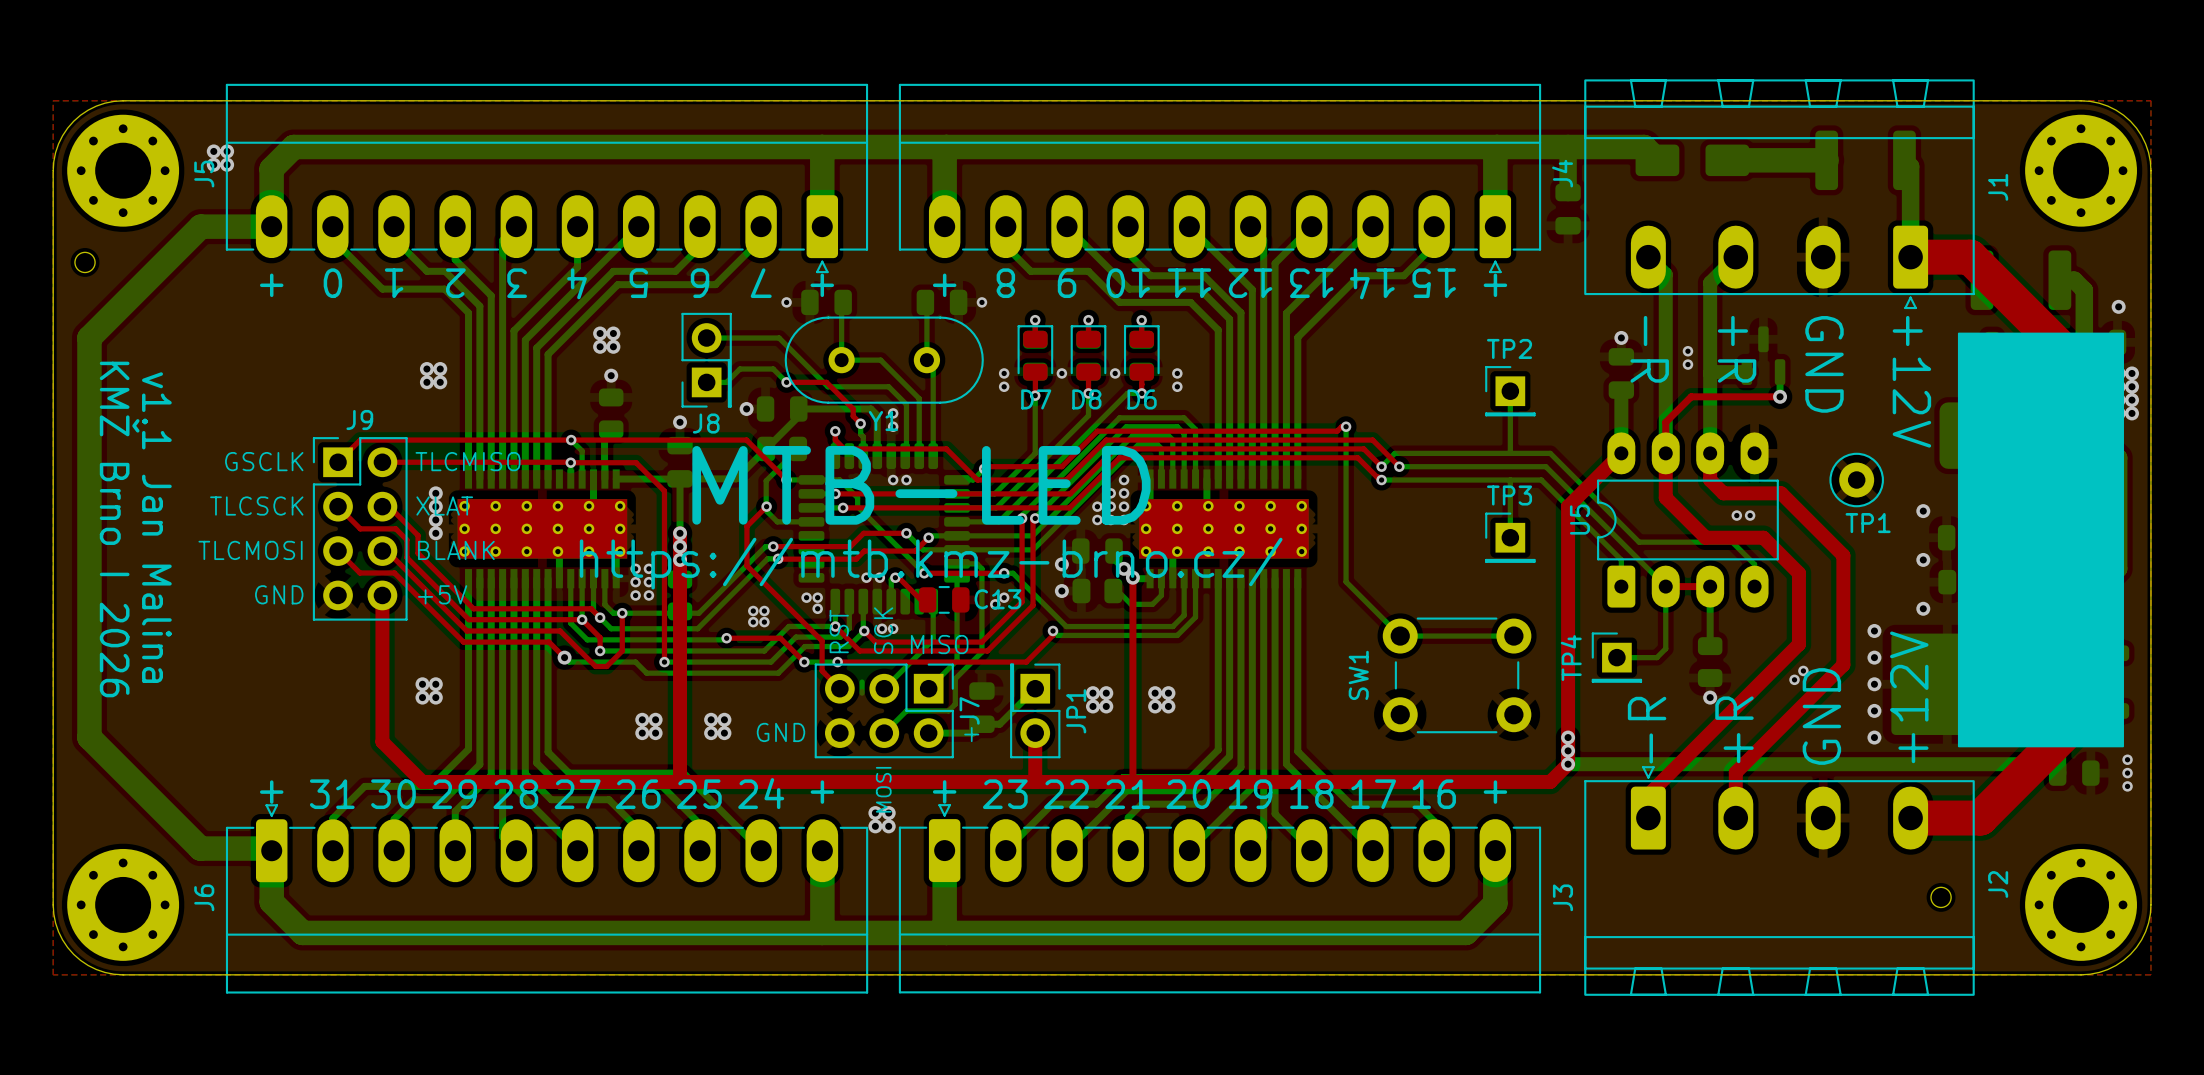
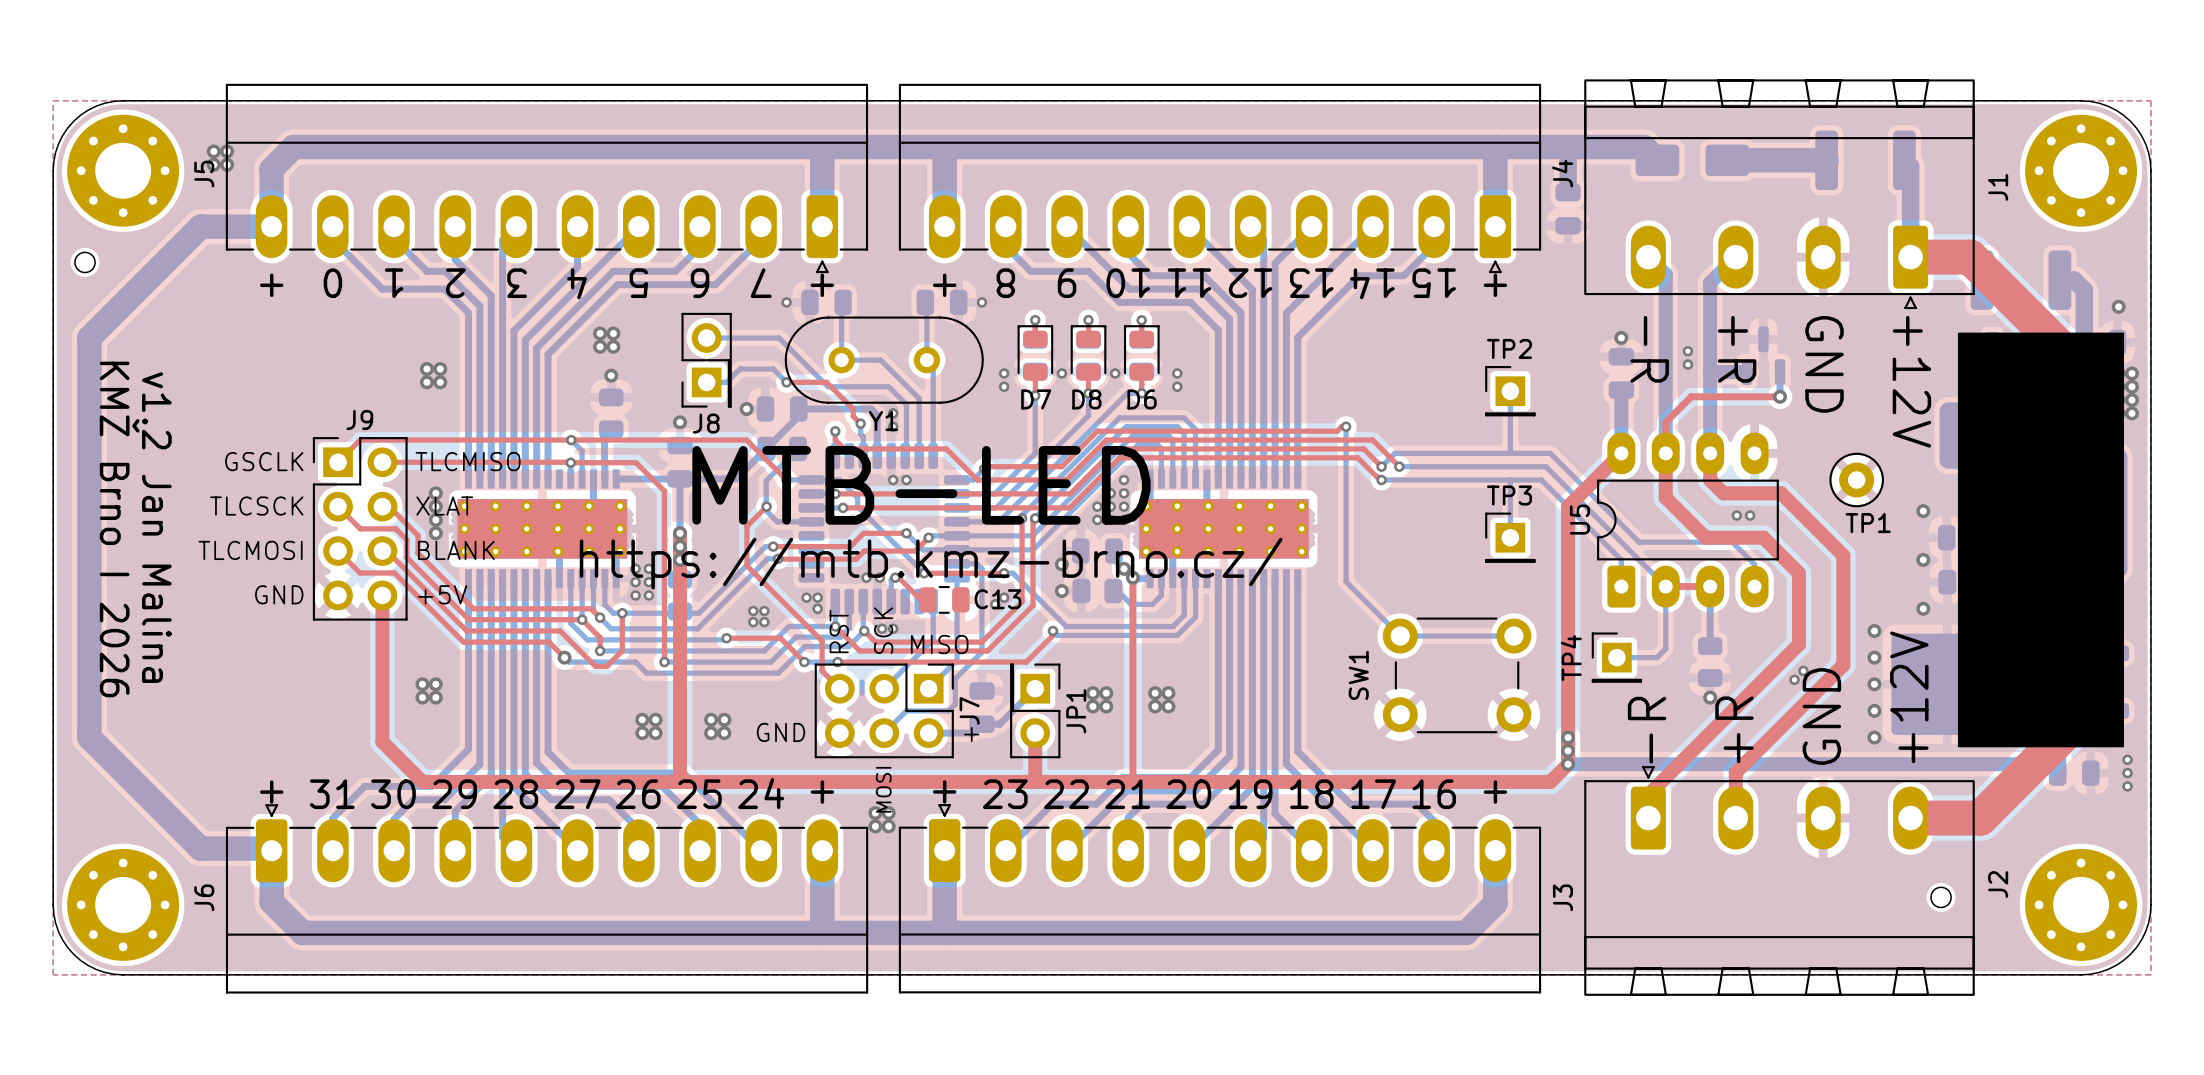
text: v1.1 Jan Malina (156, 527) -> v1.2 Jan Malina (156, 527)

